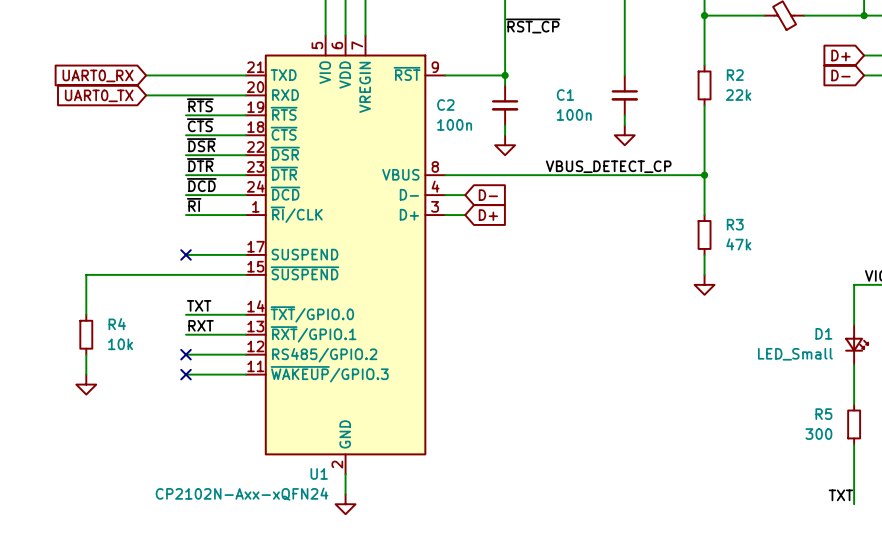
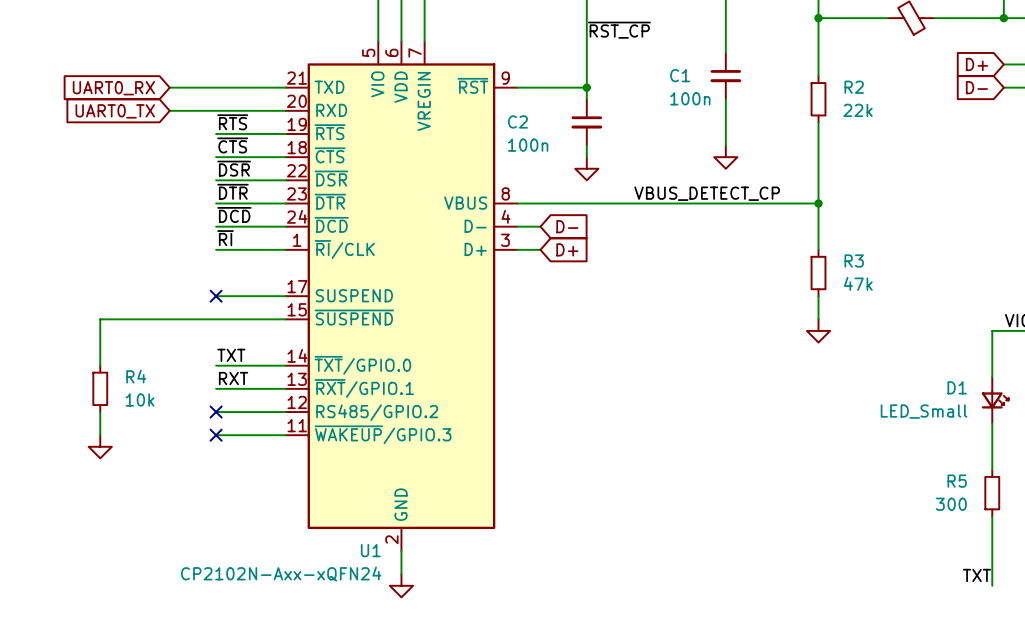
C1 name position: C1 (565, 95) -> C1 (680, 75)
C1 position: (624, 95) -> (725, 76)
C1 value position: 100n (574, 114) -> 100n (690, 98)

